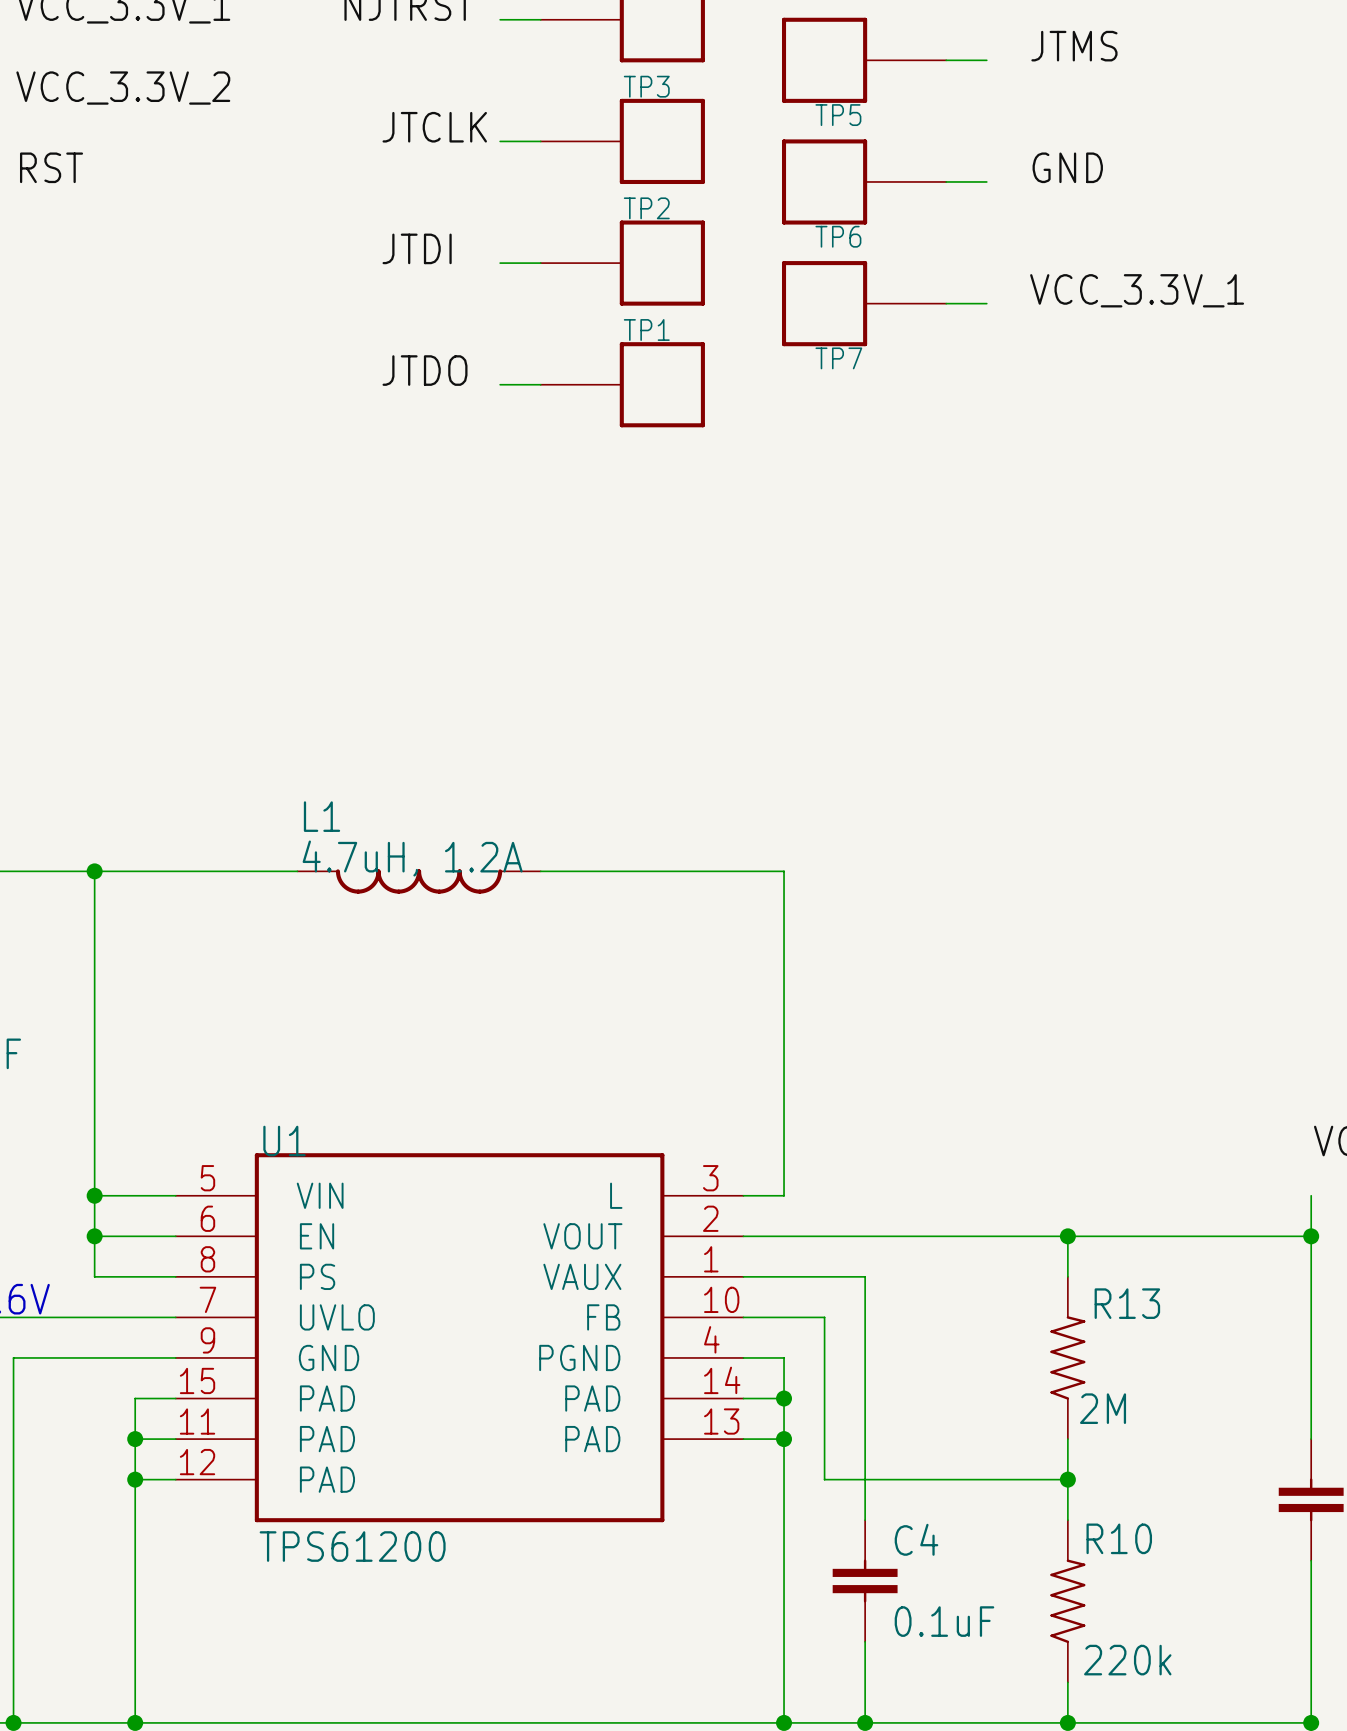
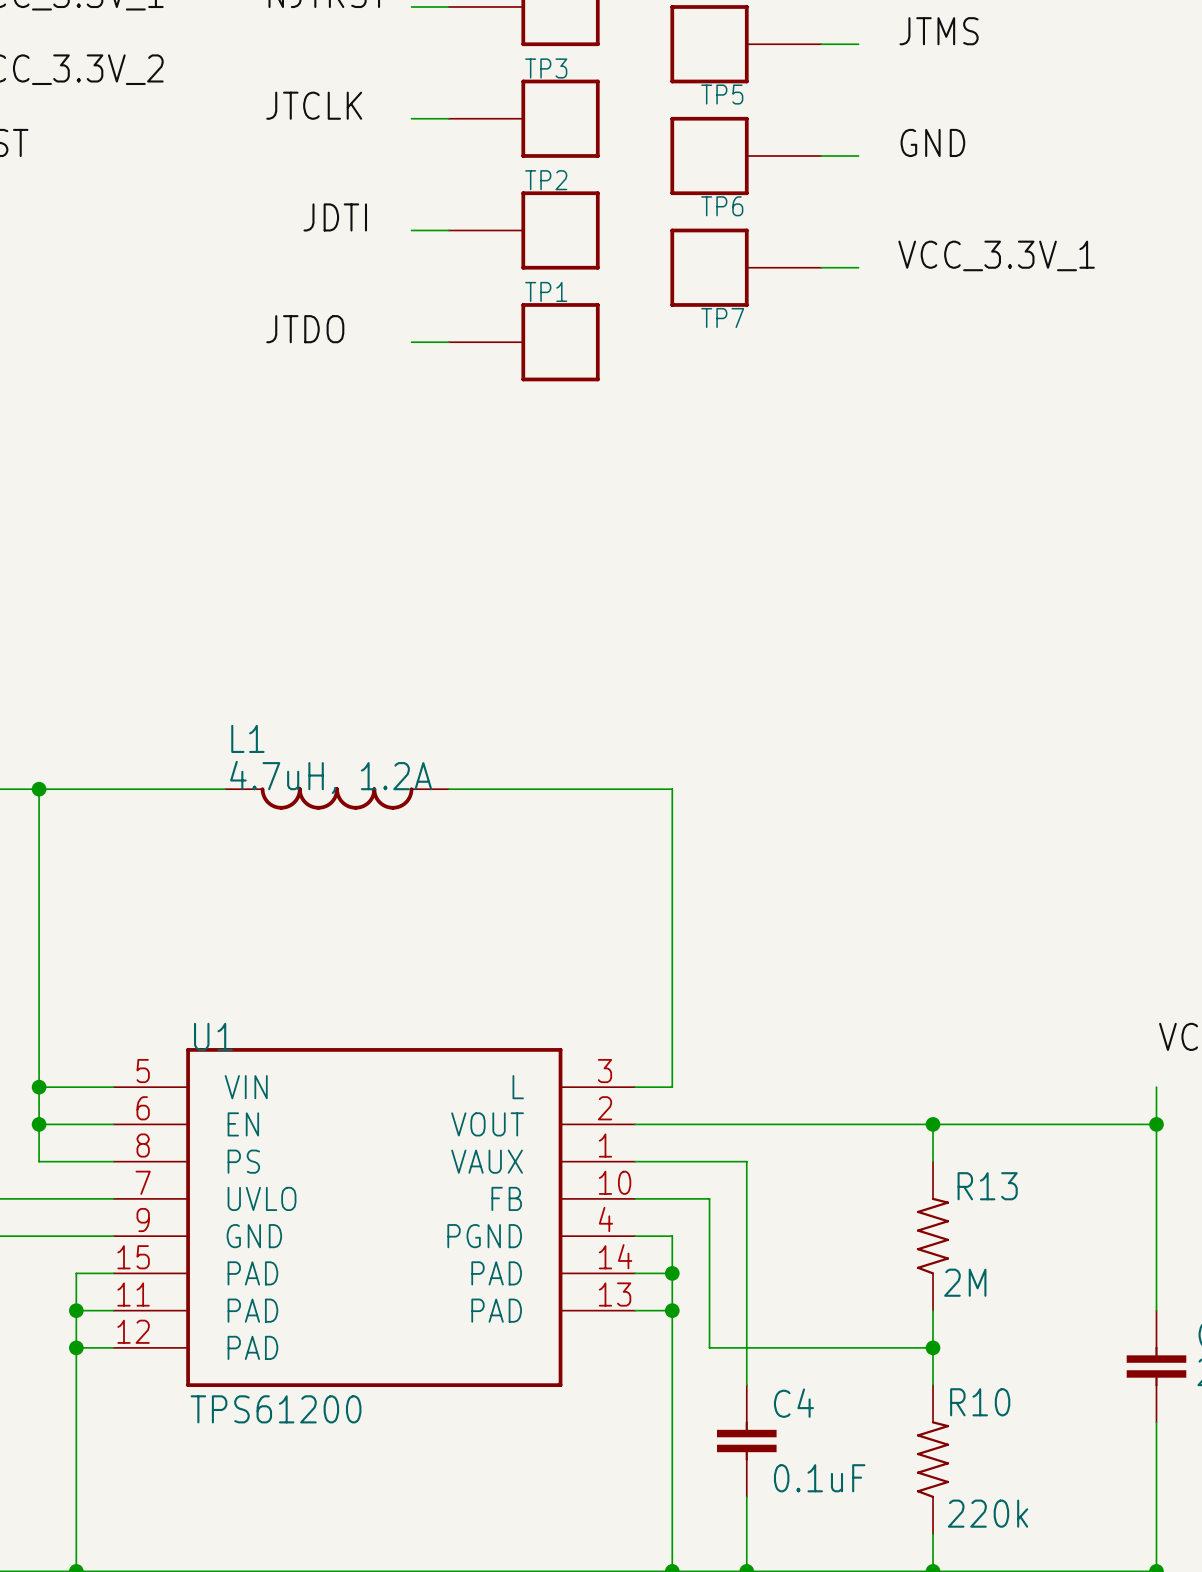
label position: JTCLK (434, 127) -> JTCLK (314, 105)
label: JTDI (417, 248) -> JDTI (335, 217)
label position: JTDO (425, 370) -> JTDO (305, 329)

